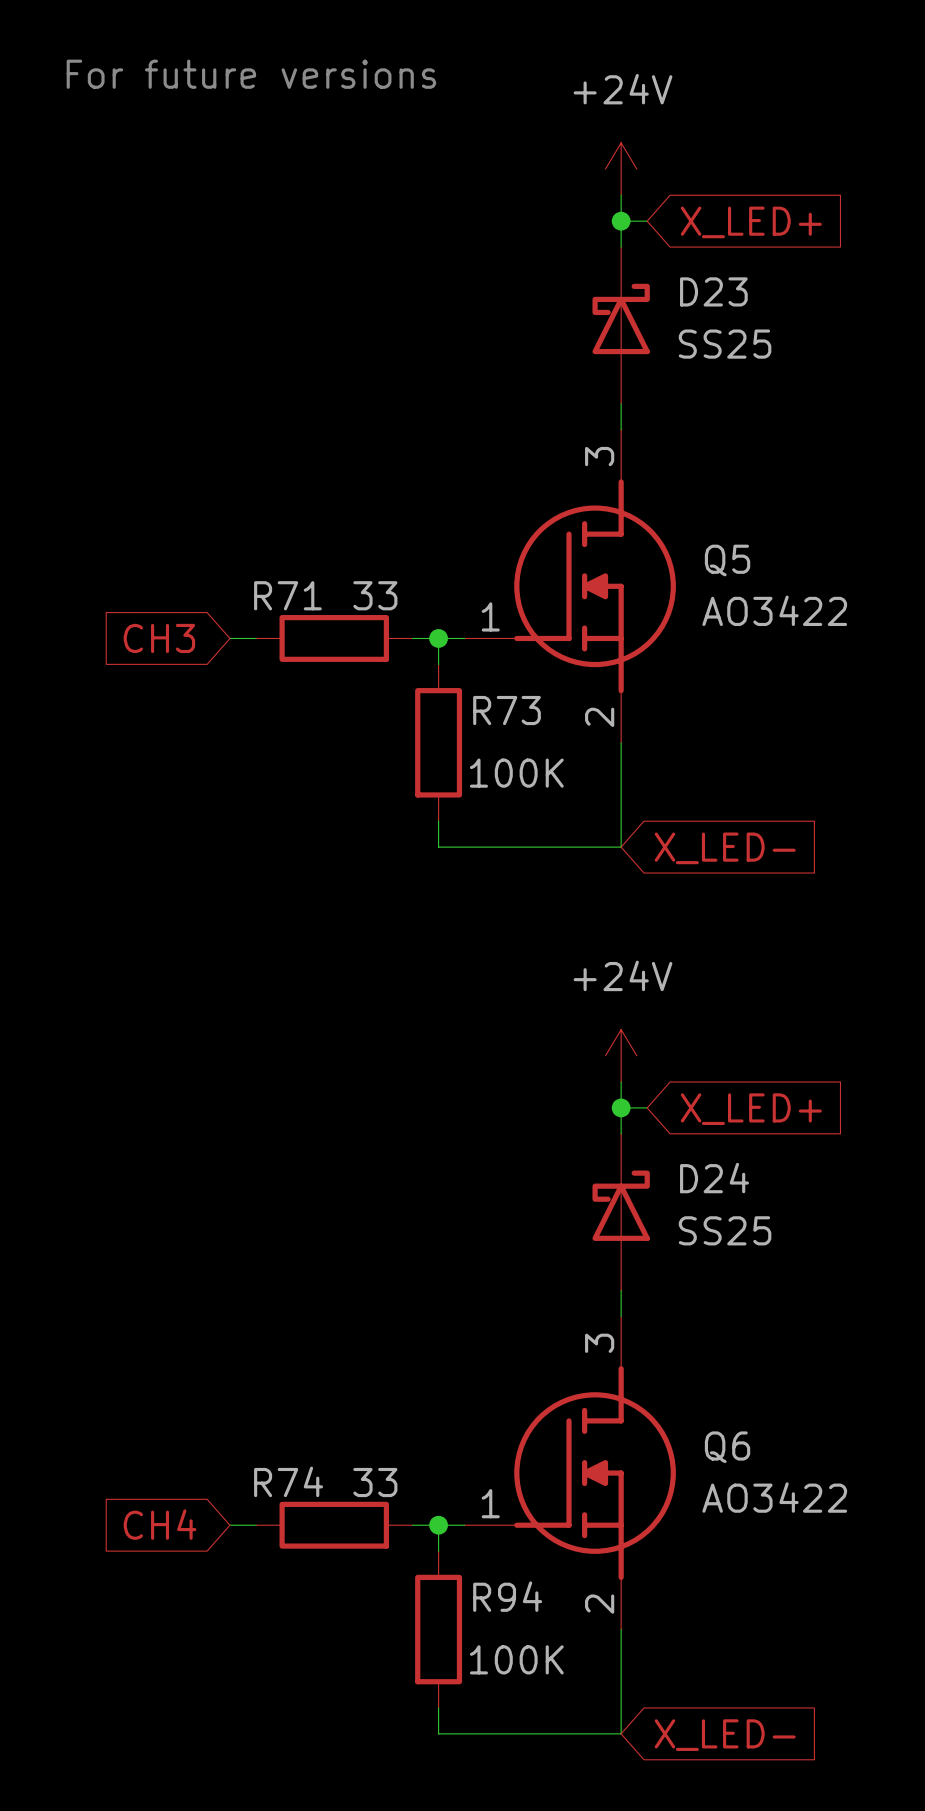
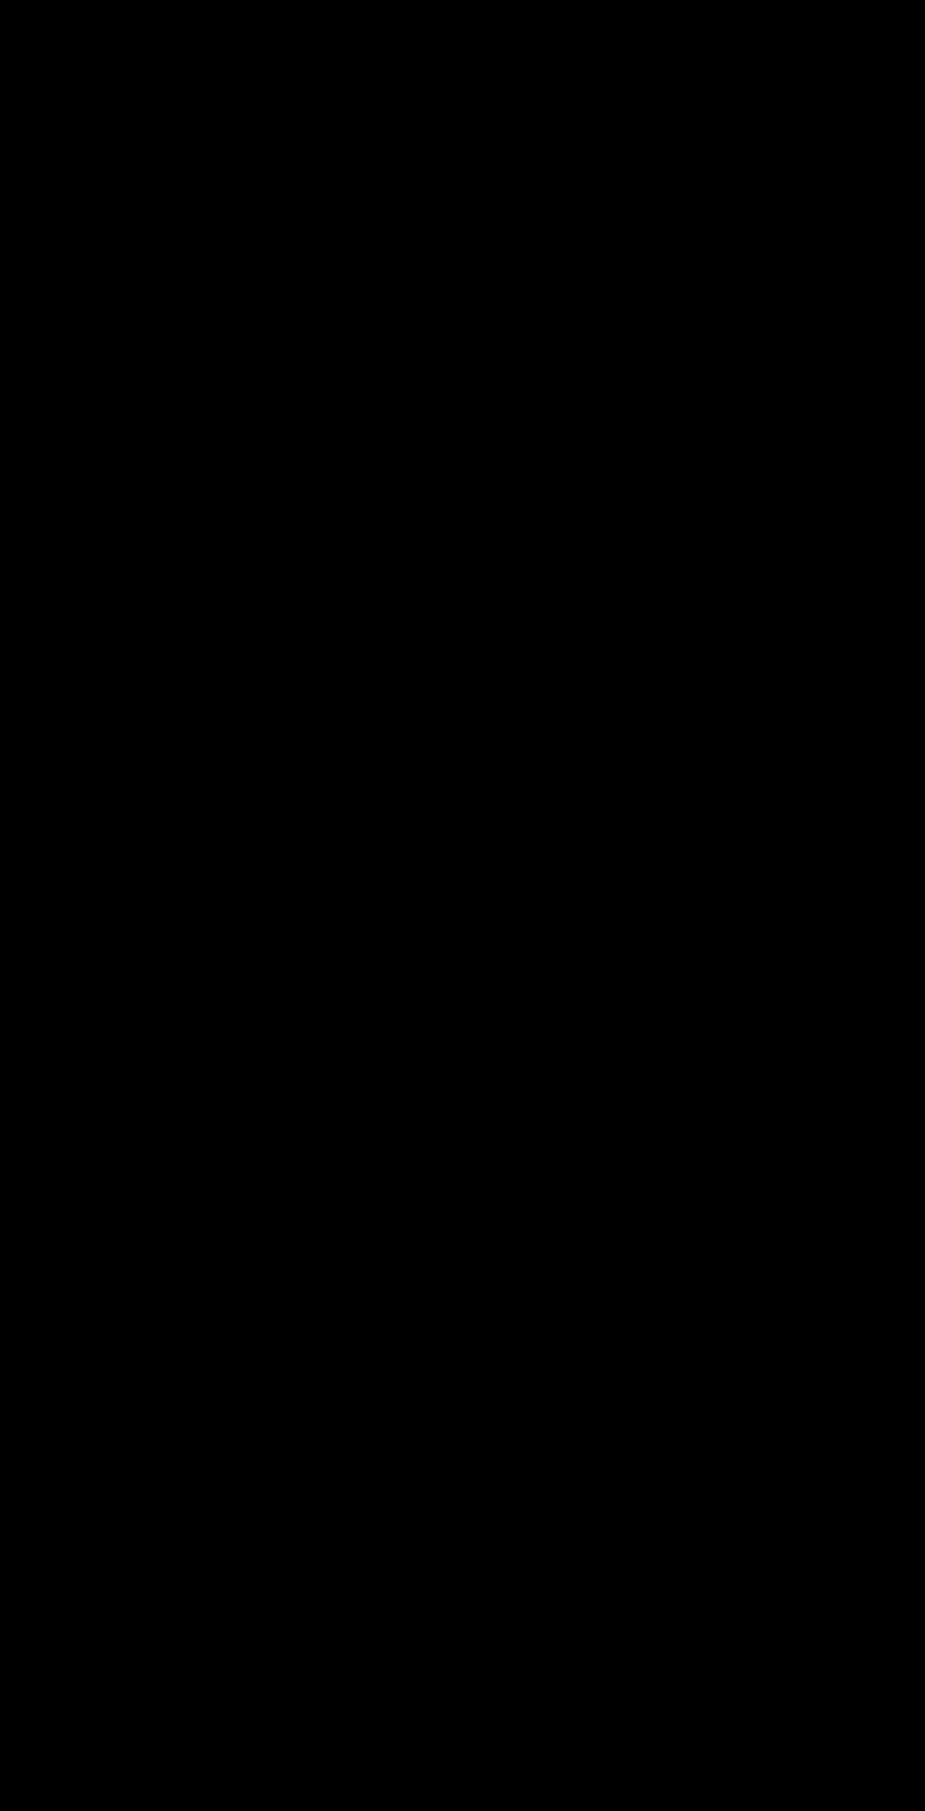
text: For future versions (251, 74) -> none
power symbol: +24V (621, 169) -> none
wire: (621, 195) (621, 247) -> none
wire: (621, 221) (647, 221) -> none
junction: (621, 221) -> none
global label: X_LED+ (751, 222) -> none
D23: SS25 (621, 325) -> none
wire: (621, 403) (621, 429) -> none
Q5: AO3422 (570, 586) -> none
global label: CH3 (159, 638) -> none
wire: (229, 638) (256, 638) -> none
R71: 33 (334, 638) -> none
wire: (412, 638) (464, 638) -> none
wire: (438, 638) (438, 664) -> none
junction: (438, 638) -> none
R73: 100K (438, 742) -> none
wire: (621, 742) (621, 847) (438, 847) (438, 821) -> none
global label: X_LED- (725, 848) -> none
power symbol: +24V (621, 1055) -> none
wire: (621, 1081) (621, 1134) -> none
wire: (621, 1107) (647, 1107) -> none
junction: (621, 1107) -> none
global label: X_LED+ (751, 1109) -> none
D24: SS25 (621, 1212) -> none
wire: (621, 1290) (621, 1316) -> none
Q6: AO3422 (570, 1473) -> none
global label: CH4 (160, 1524) -> none
wire: (229, 1525) (256, 1525) -> none
R74: 33 (334, 1525) -> none
wire: (412, 1525) (464, 1525) -> none
wire: (438, 1525) (438, 1551) -> none
junction: (438, 1525) -> none
R94: 100K (438, 1629) -> none
wire: (621, 1629) (621, 1733) (438, 1733) (438, 1707) -> none
global label: X_LED- (725, 1735) -> none

